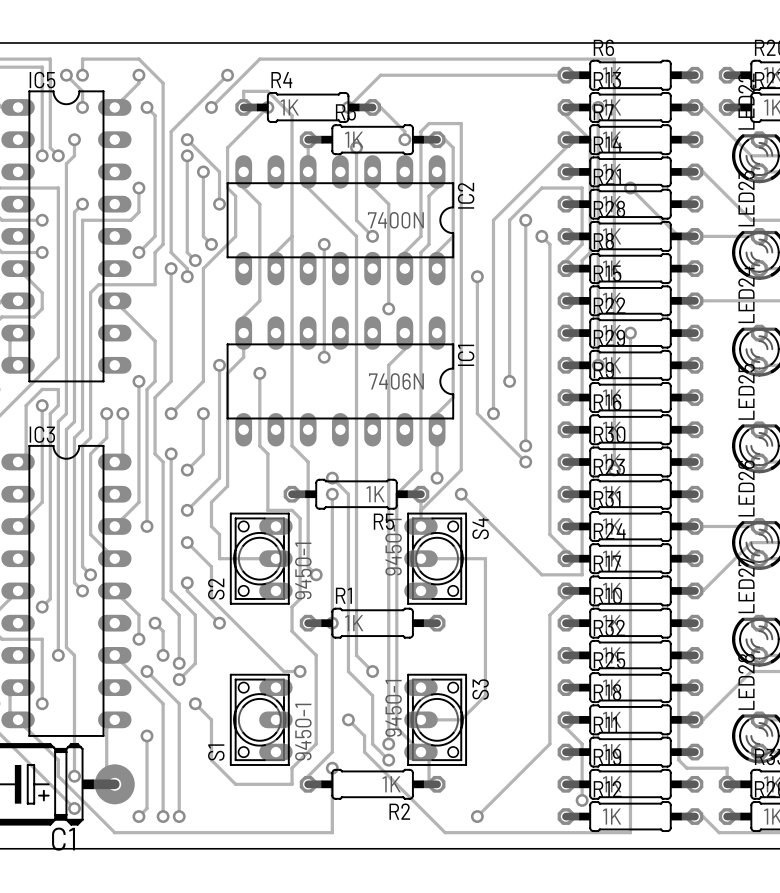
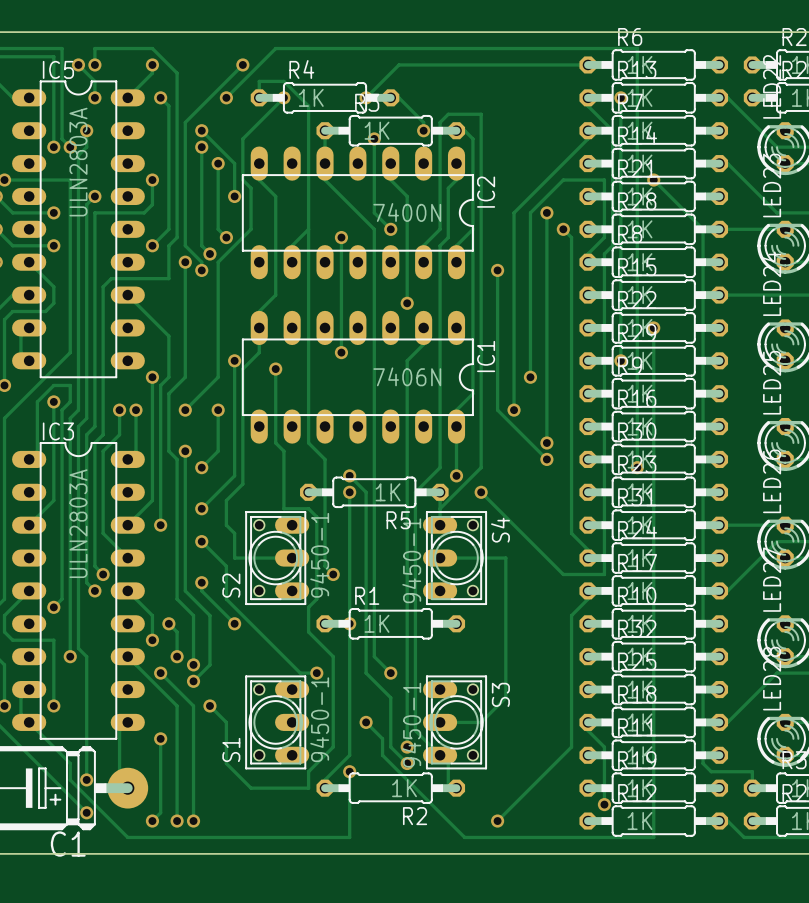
IC5 value: none -> ULN2803A (78, 162)
IC3 value: none -> ULN2803A (78, 523)

